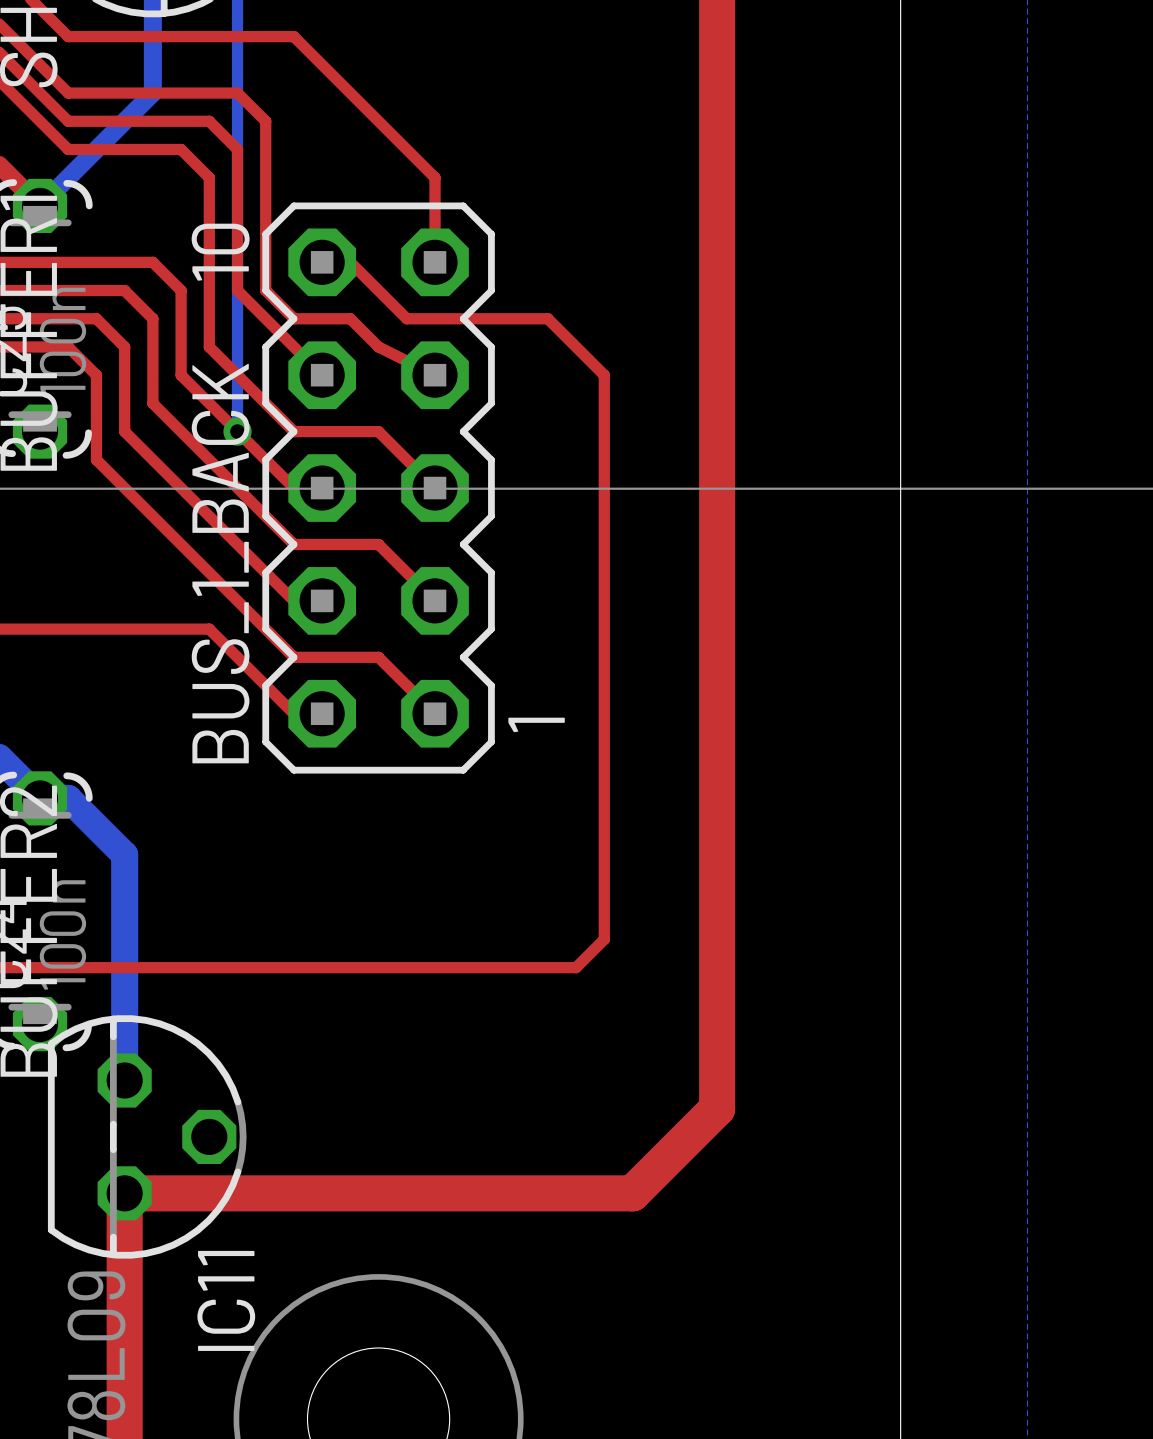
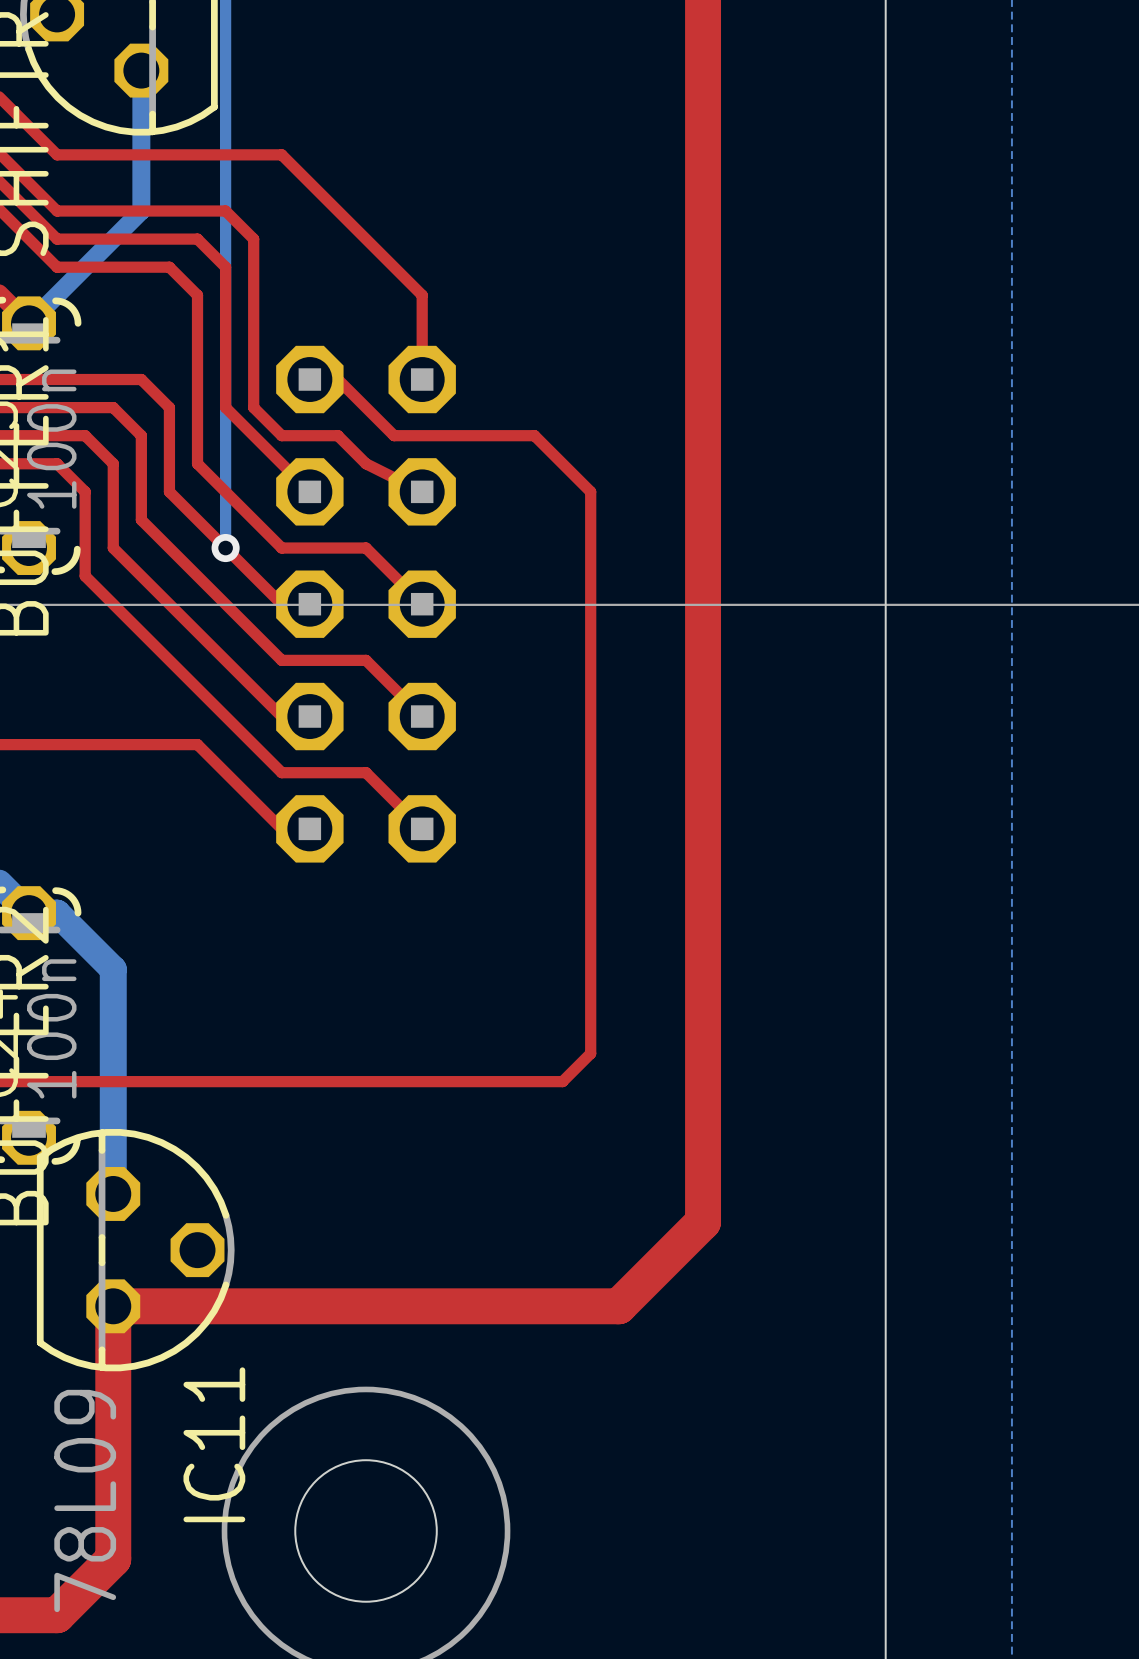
BUS_1_BACK: (378, 488) -> none

